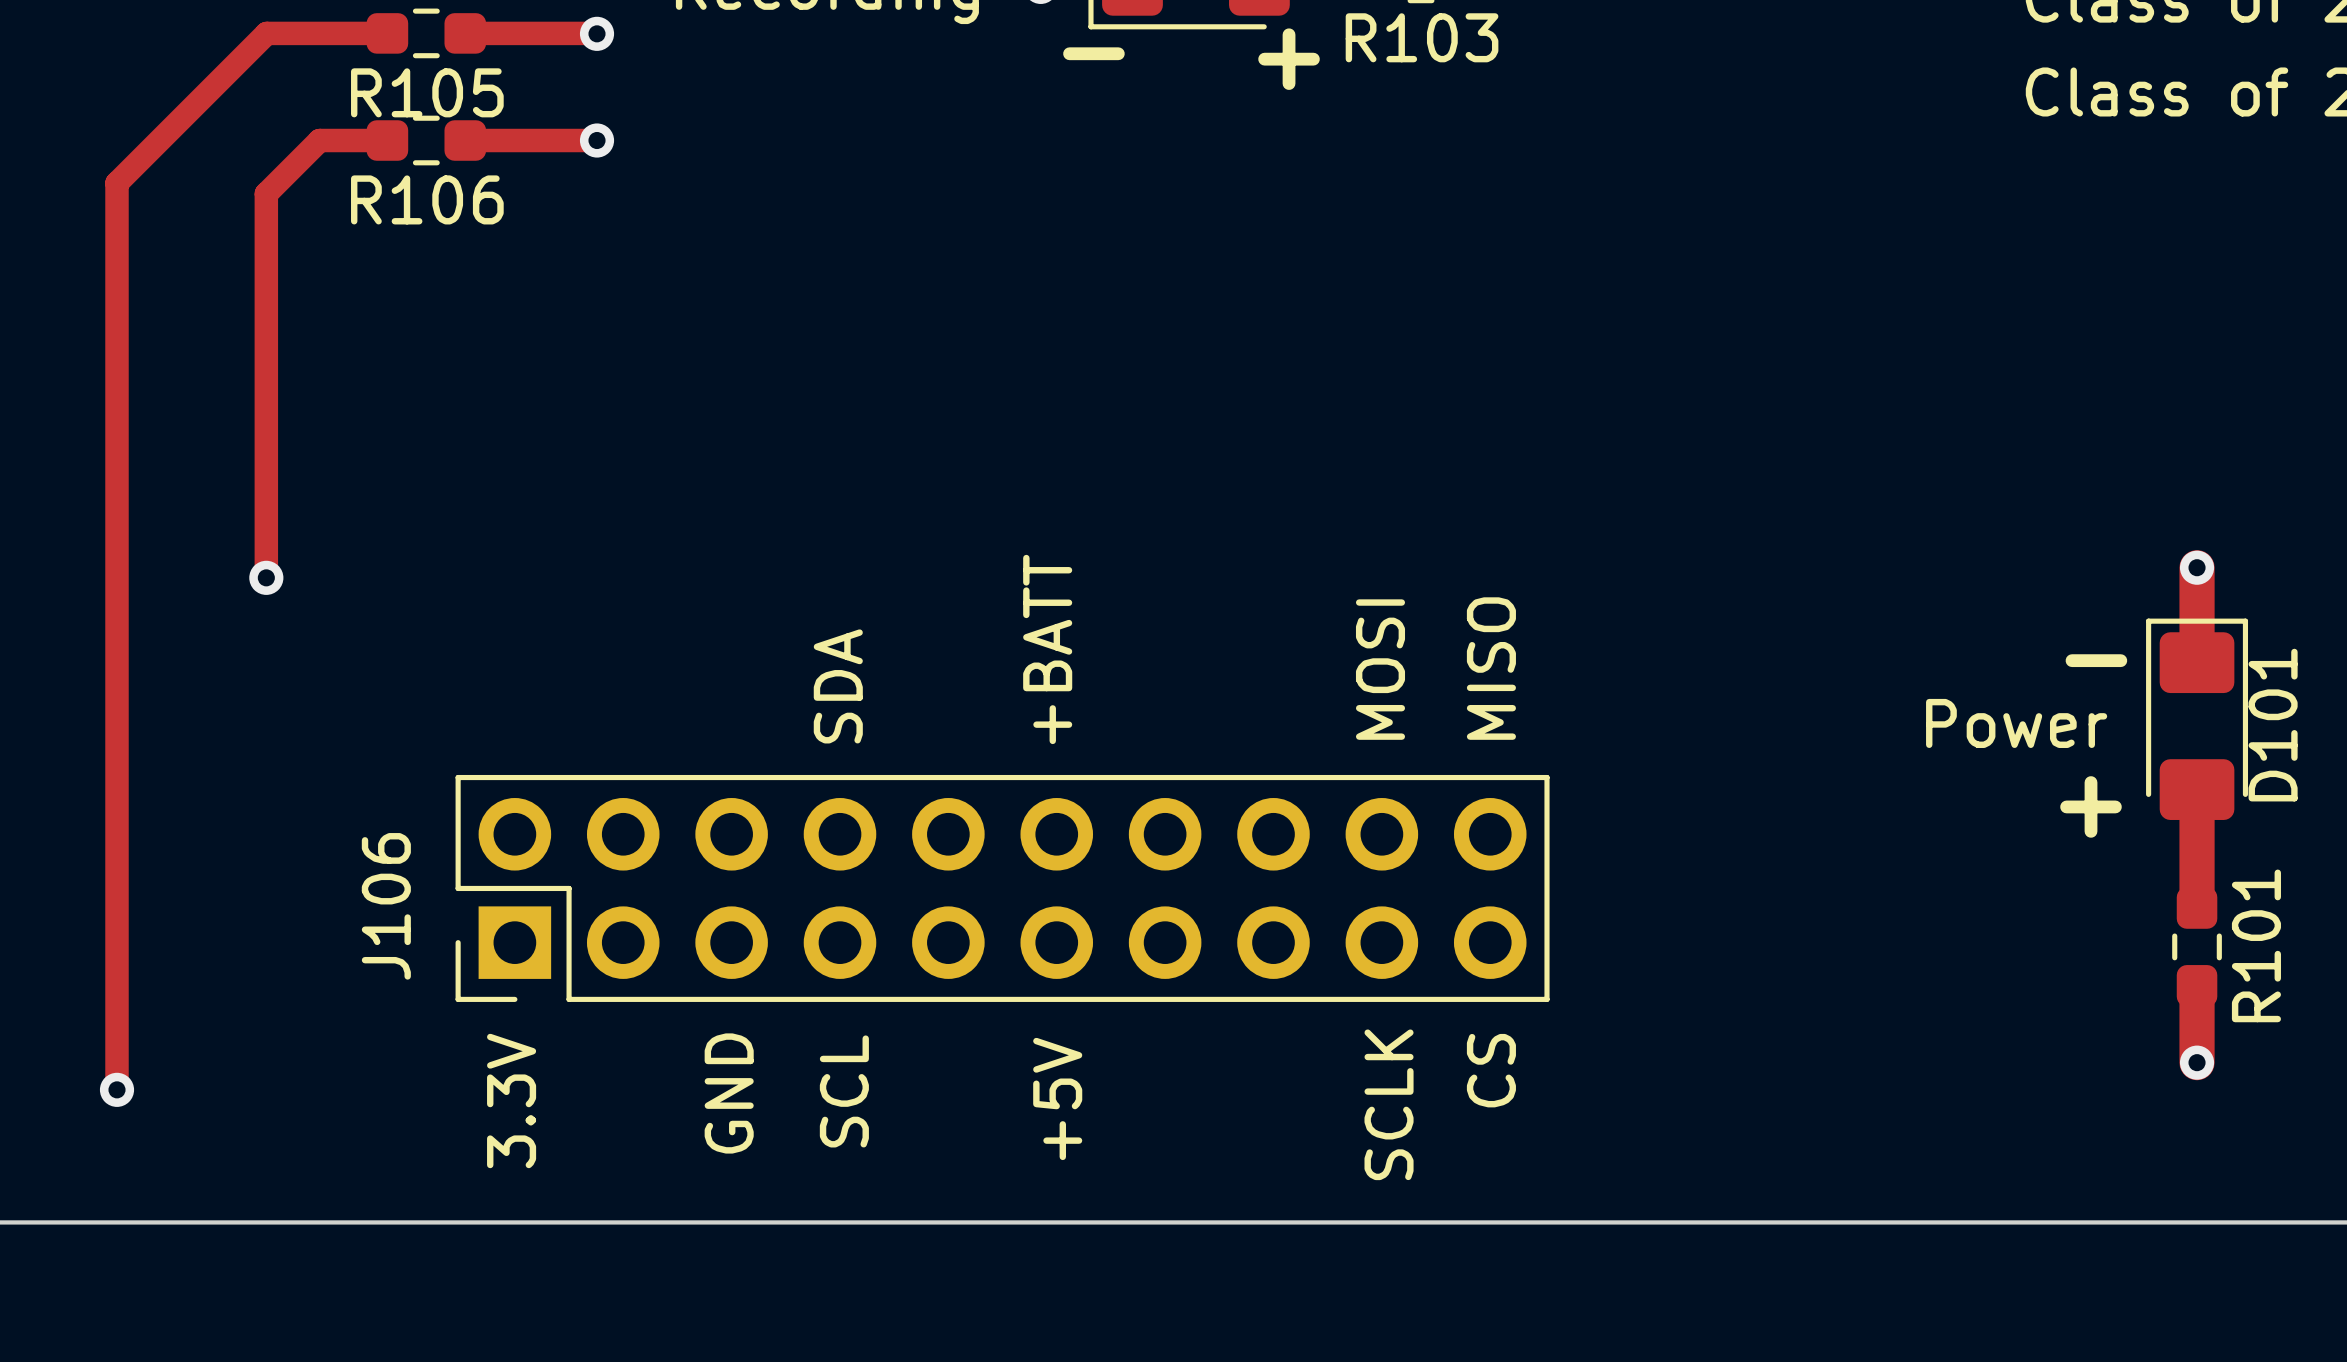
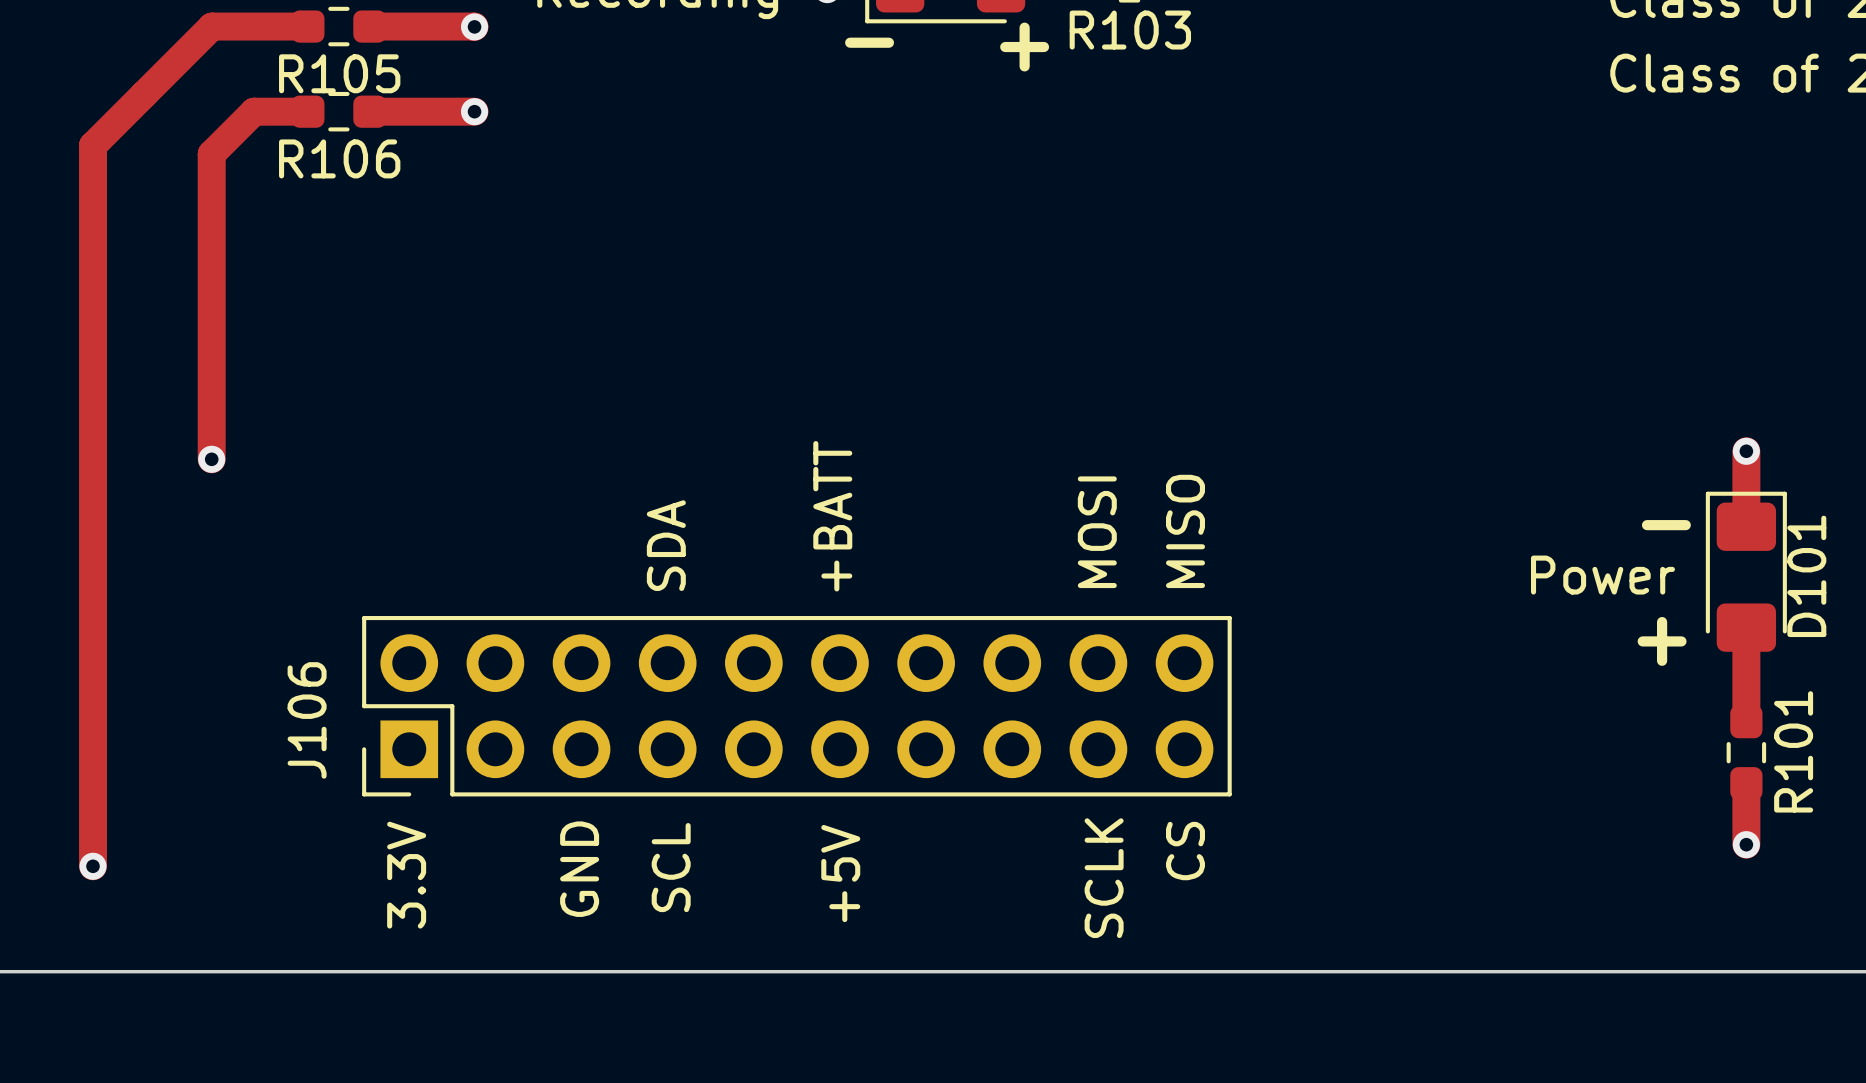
track width: thin (387, 33) (266, 33) (117, 183) (117, 1089) -> thick (307, 26) (212, 26) (93, 145) (93, 866)
track width: thin (465, 33) (596, 33) -> thick (369, 26) (474, 26)
track width: thin (387, 140) (319, 140) (266, 193) (266, 577) -> thick (307, 111) (254, 111) (211, 154) (211, 459)
track width: thin (465, 140) (597, 140) -> thick (369, 111) (474, 111)

